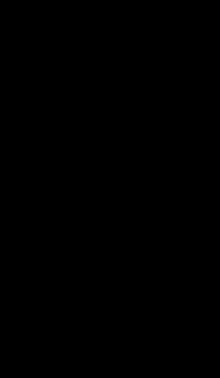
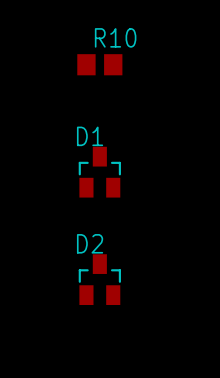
R10: none -> (99, 64)
D1: none -> (99, 172)
D2: none -> (99, 279)

